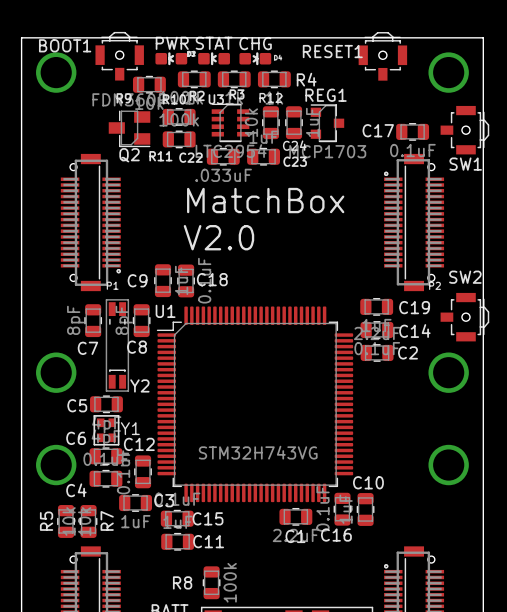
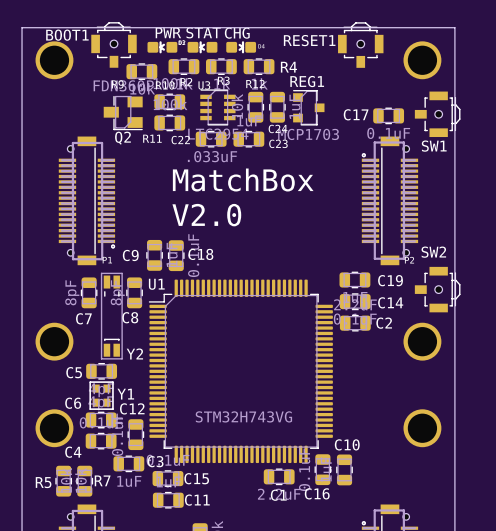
R7 name rotation: 0° (107, 520) -> 90° clockwise (102, 480)
R5 name rotation: 0° (46, 521) -> 90° clockwise (43, 482)

